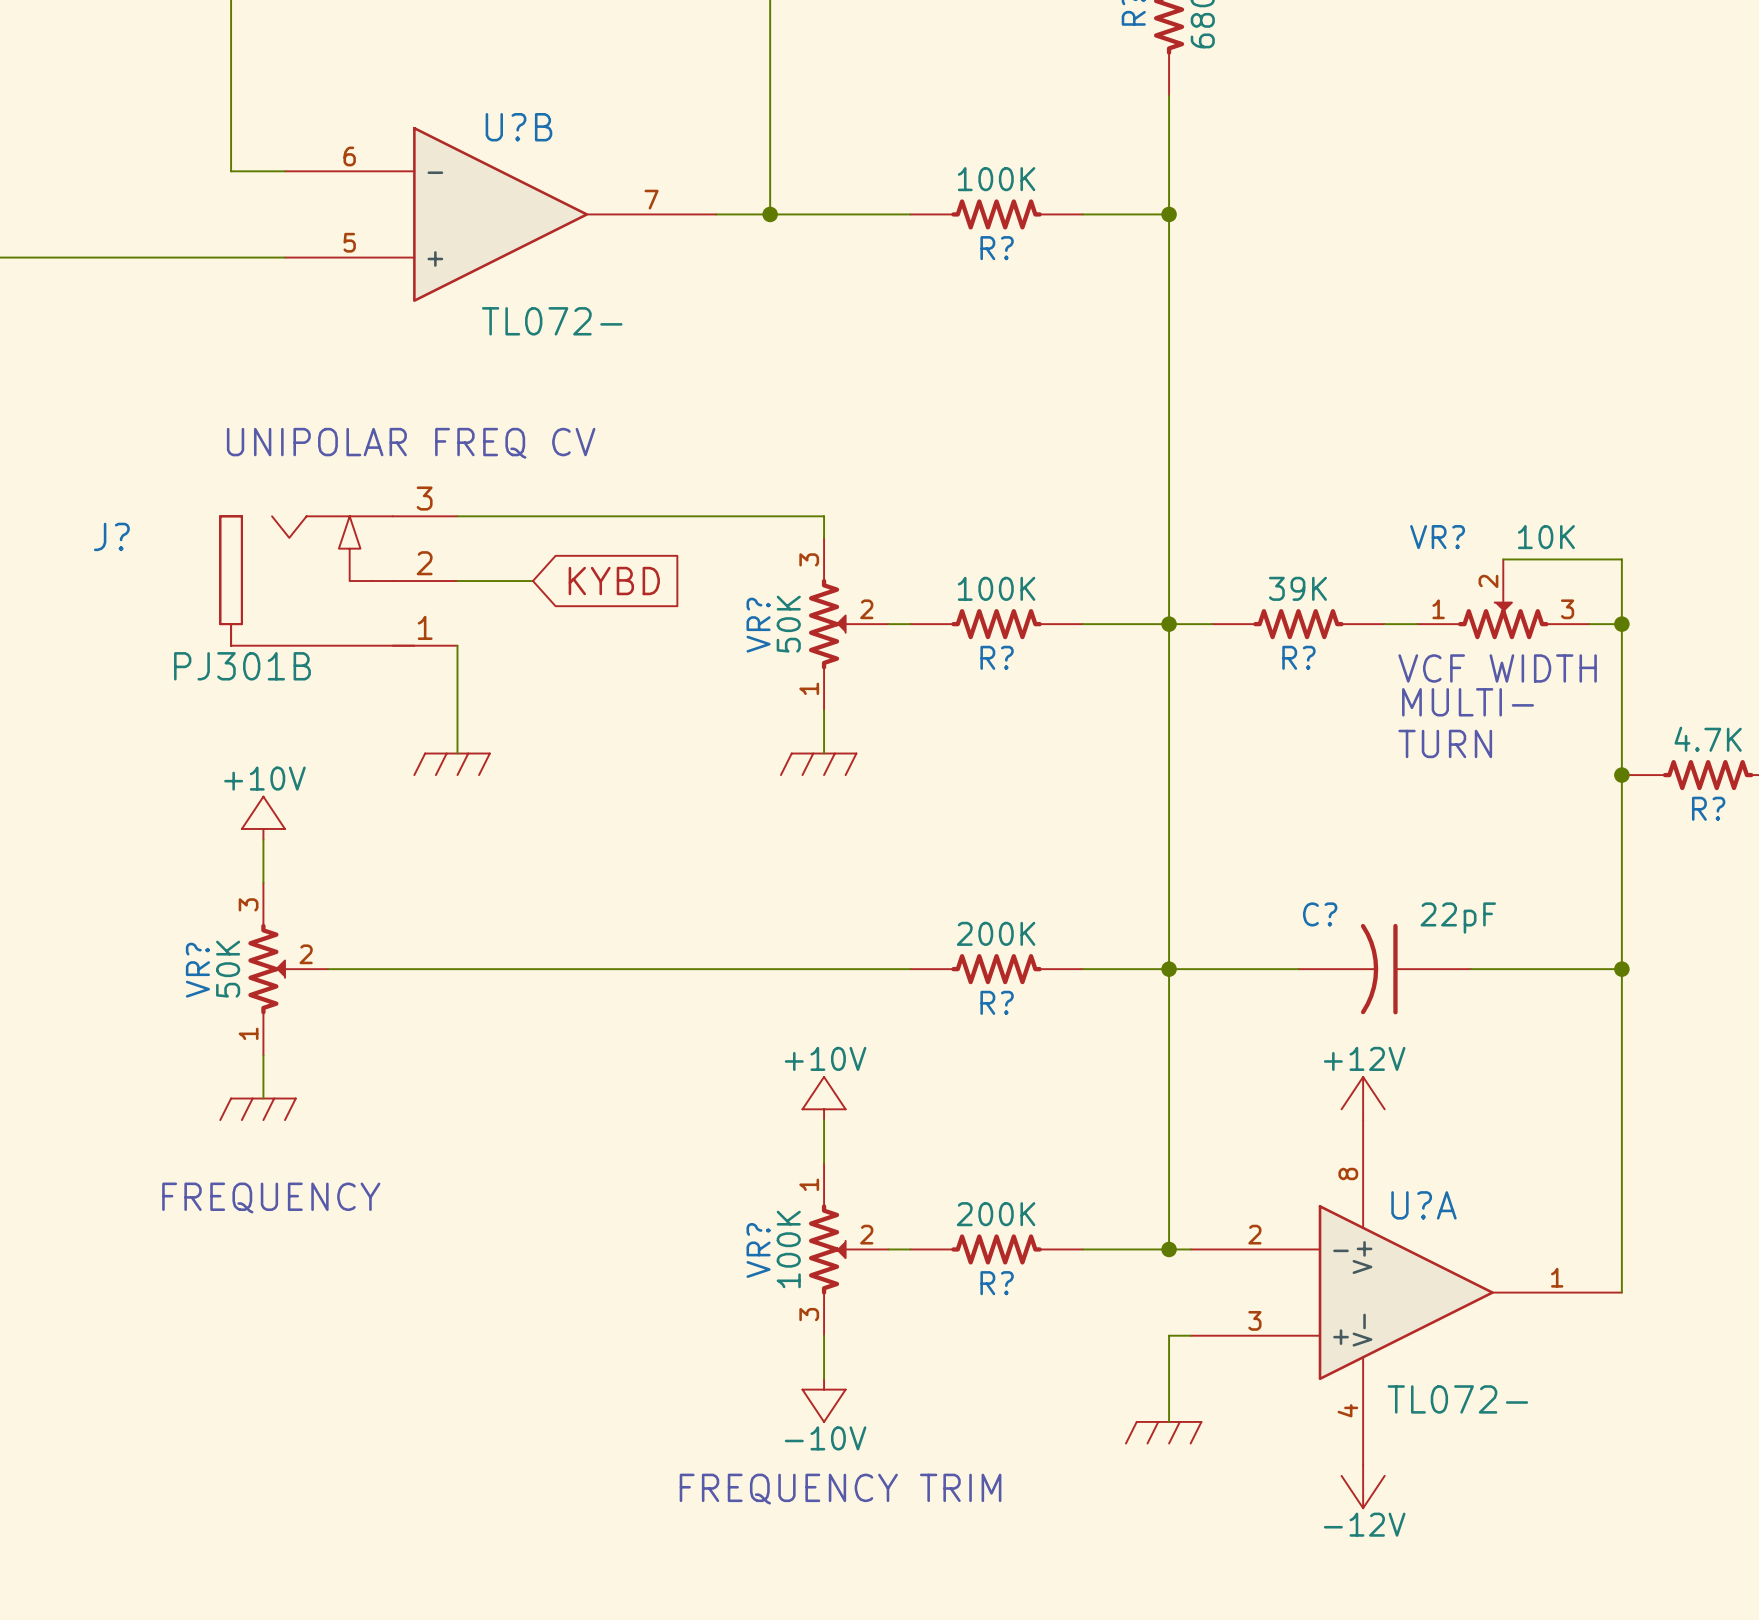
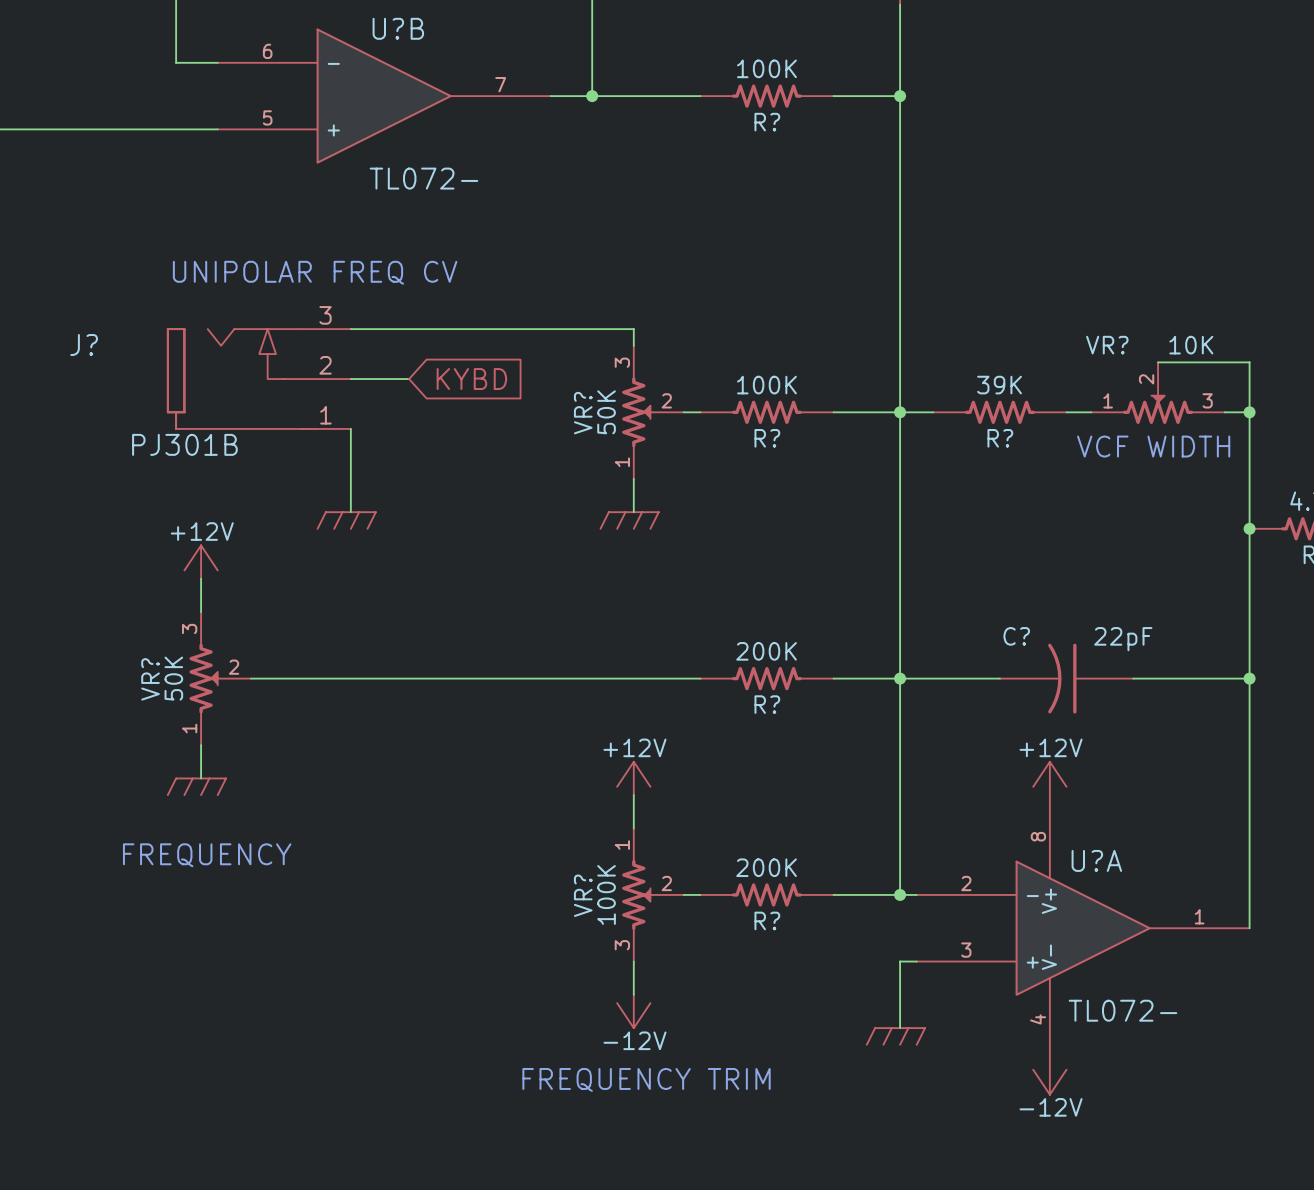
text: MULTI- (1468, 702) -> none
text: TURN (1445, 743) -> none
power symbol: +10V (263, 818) -> +12V (201, 562)
power symbol: +10V (824, 1098) -> +12V (633, 778)
power symbol: -10V (824, 1400) -> -12V (633, 1011)

